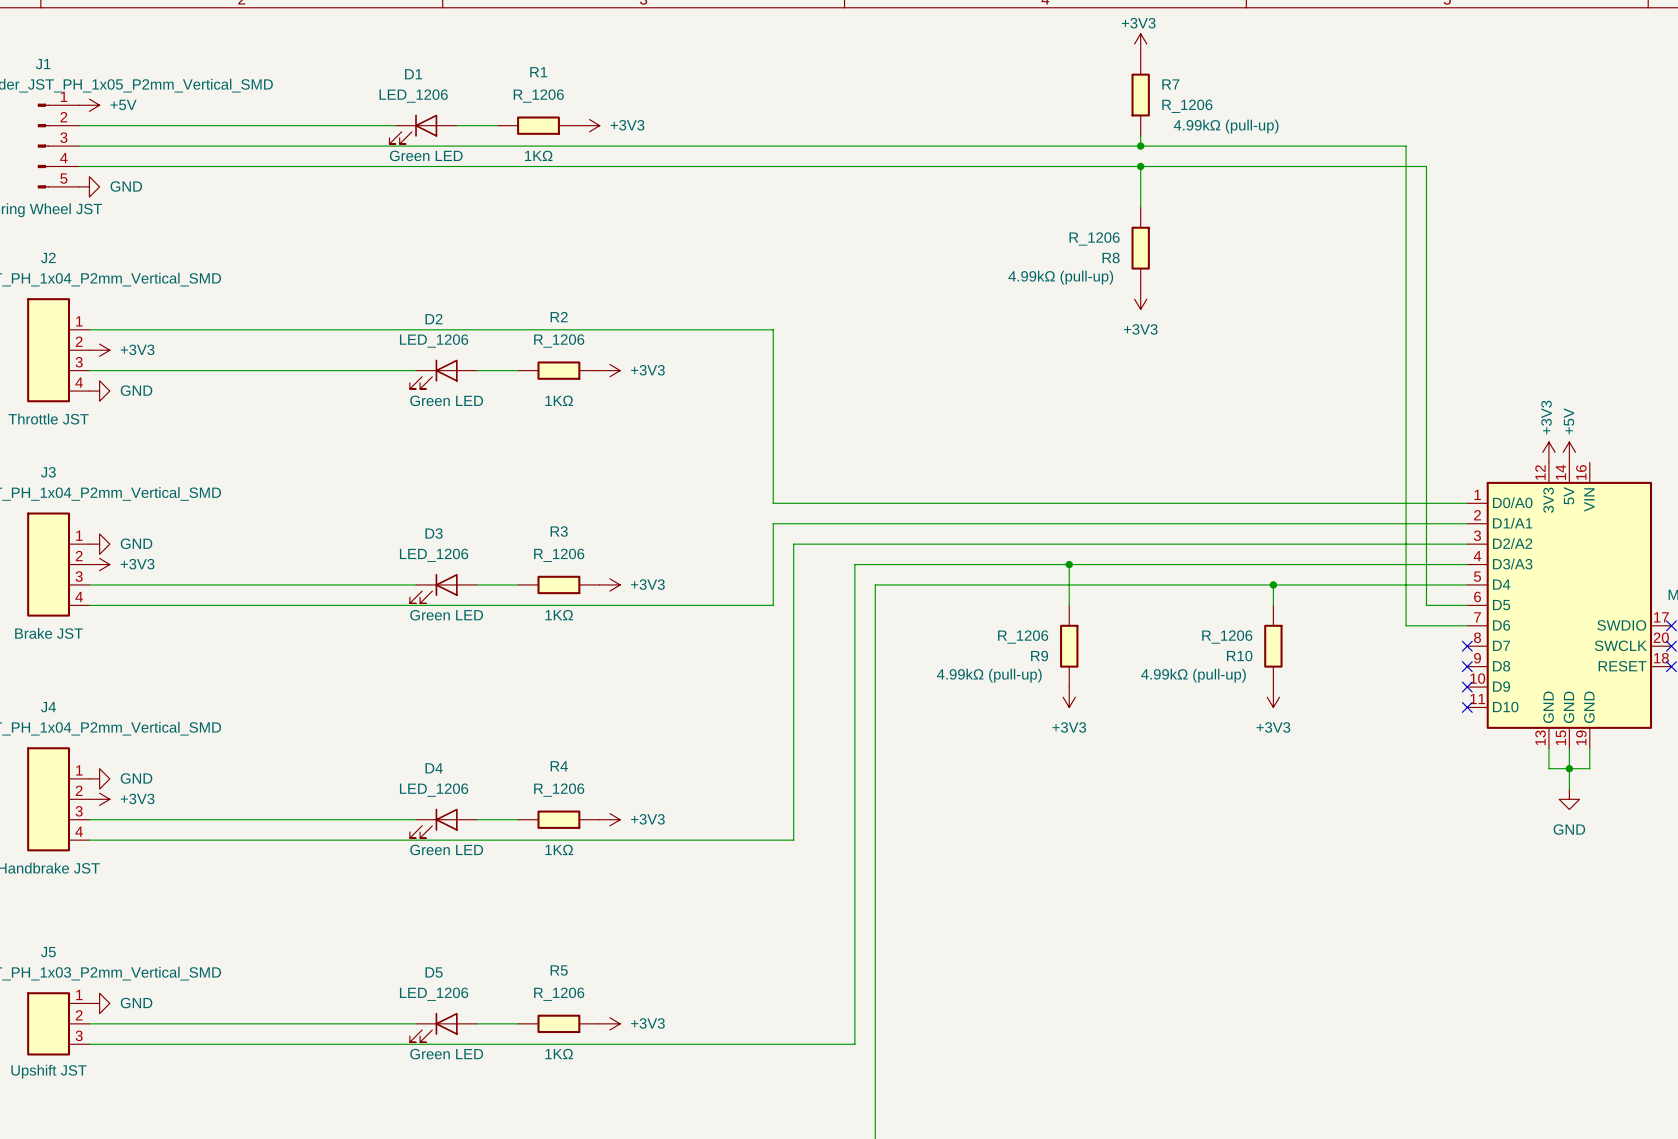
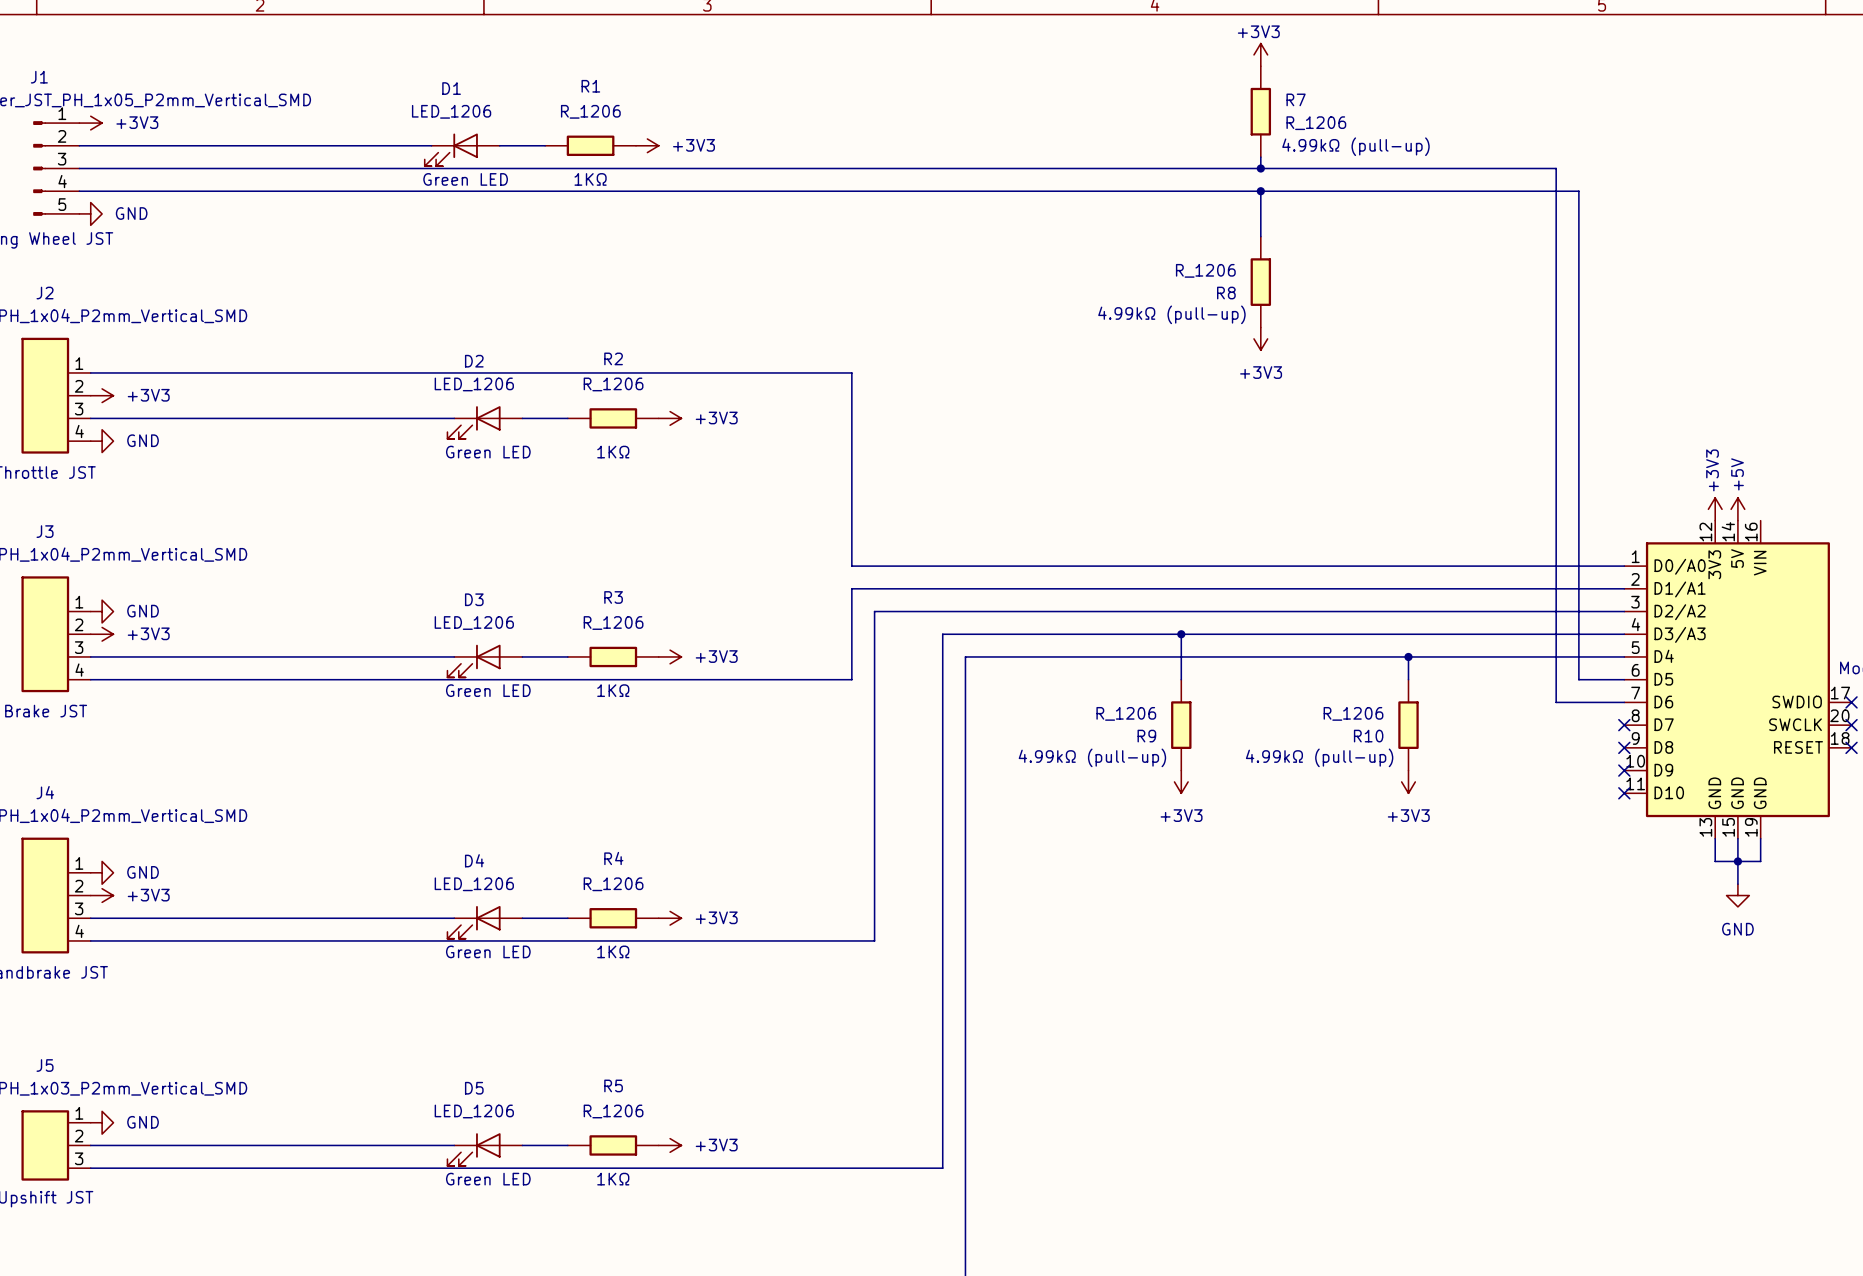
power symbol: +5V (89, 105) -> +3V3 (90, 123)

